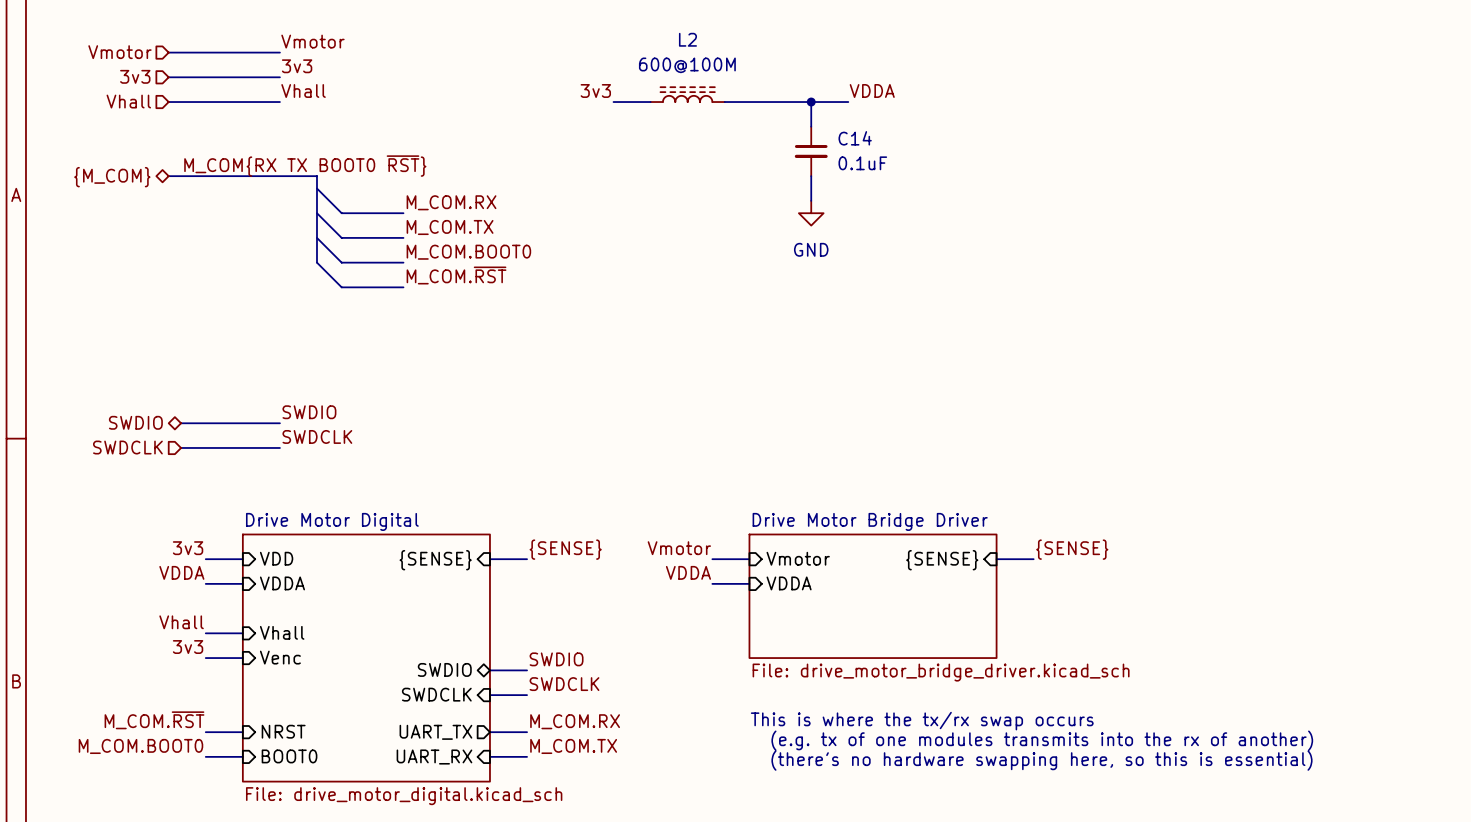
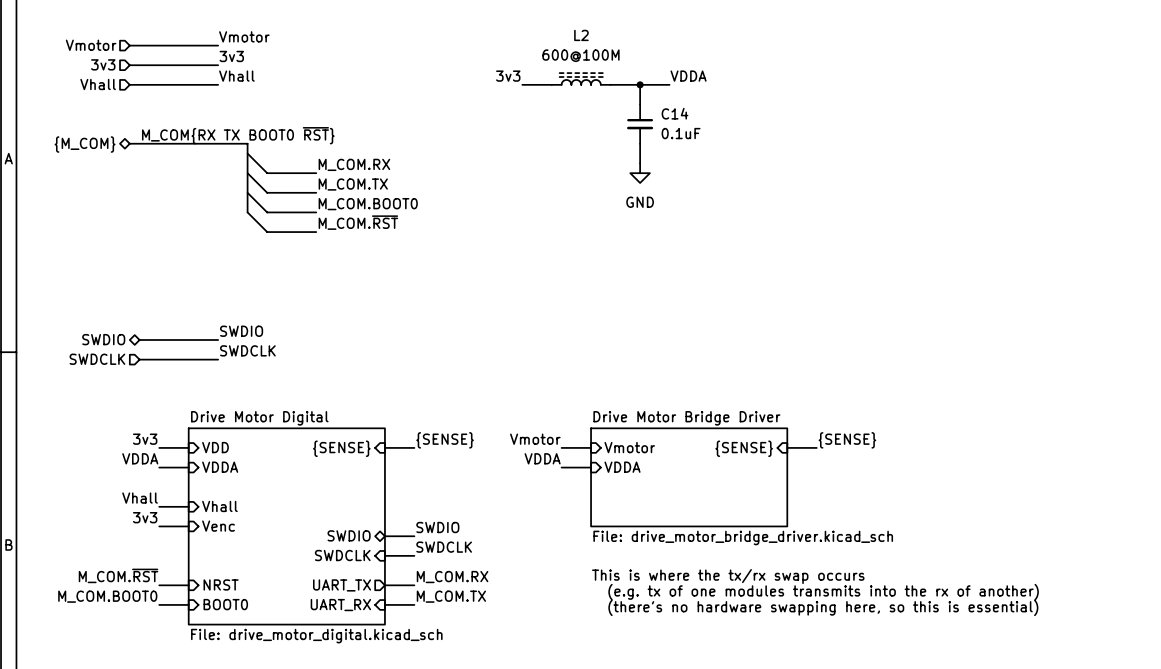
label position: 3v3 (595, 90) -> 3v3 (508, 76)
L2 position: (687, 94) -> (581, 78)
wire: (613, 102) (650, 102) -> (522, 84) (551, 84)
wire: (724, 102) (774, 102) -> none

